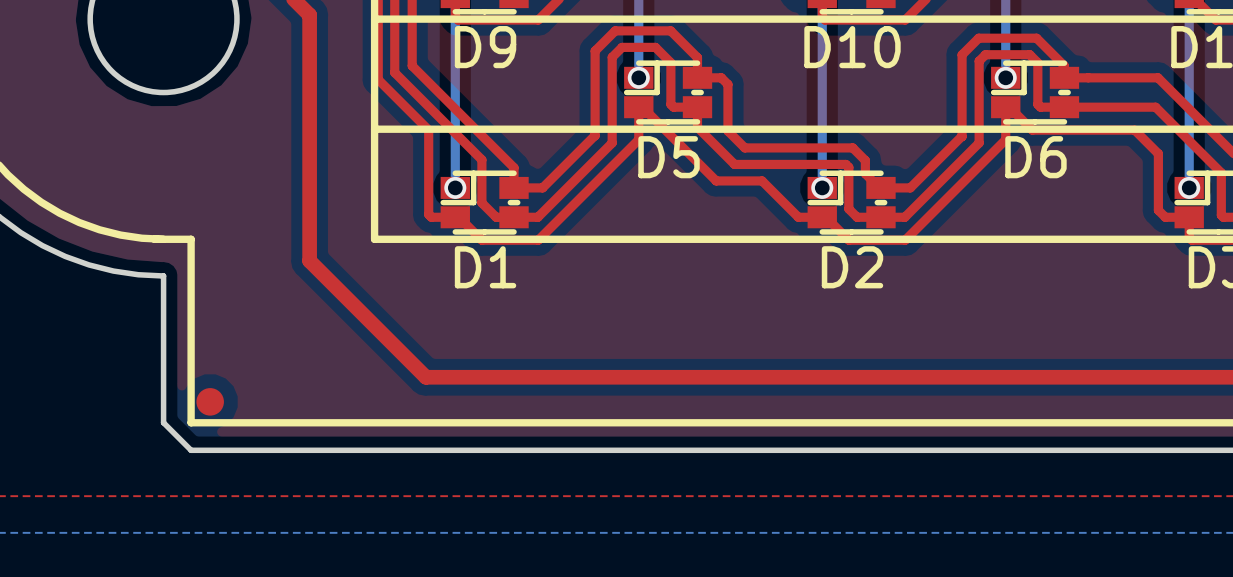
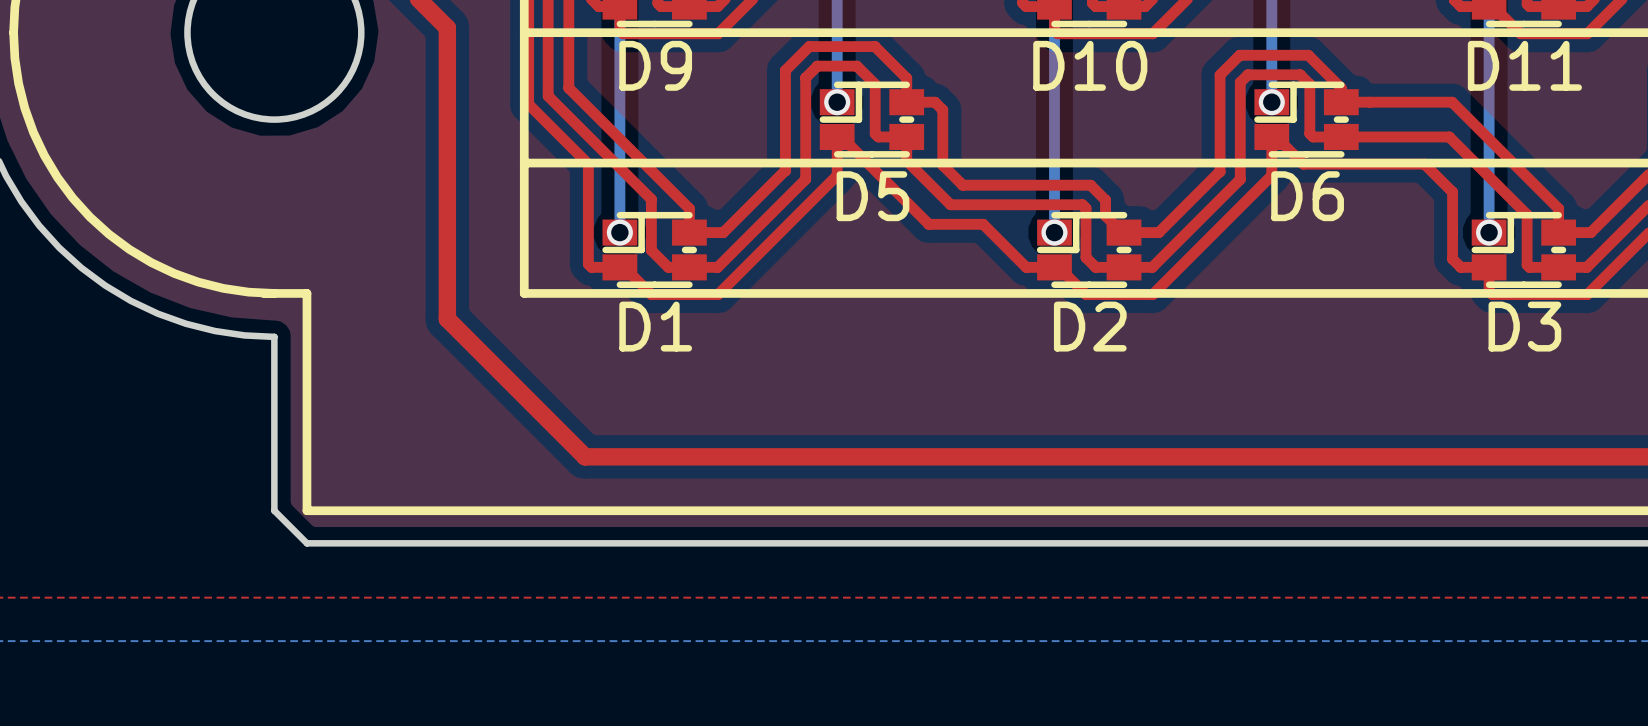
part: (210, 401) -> none

